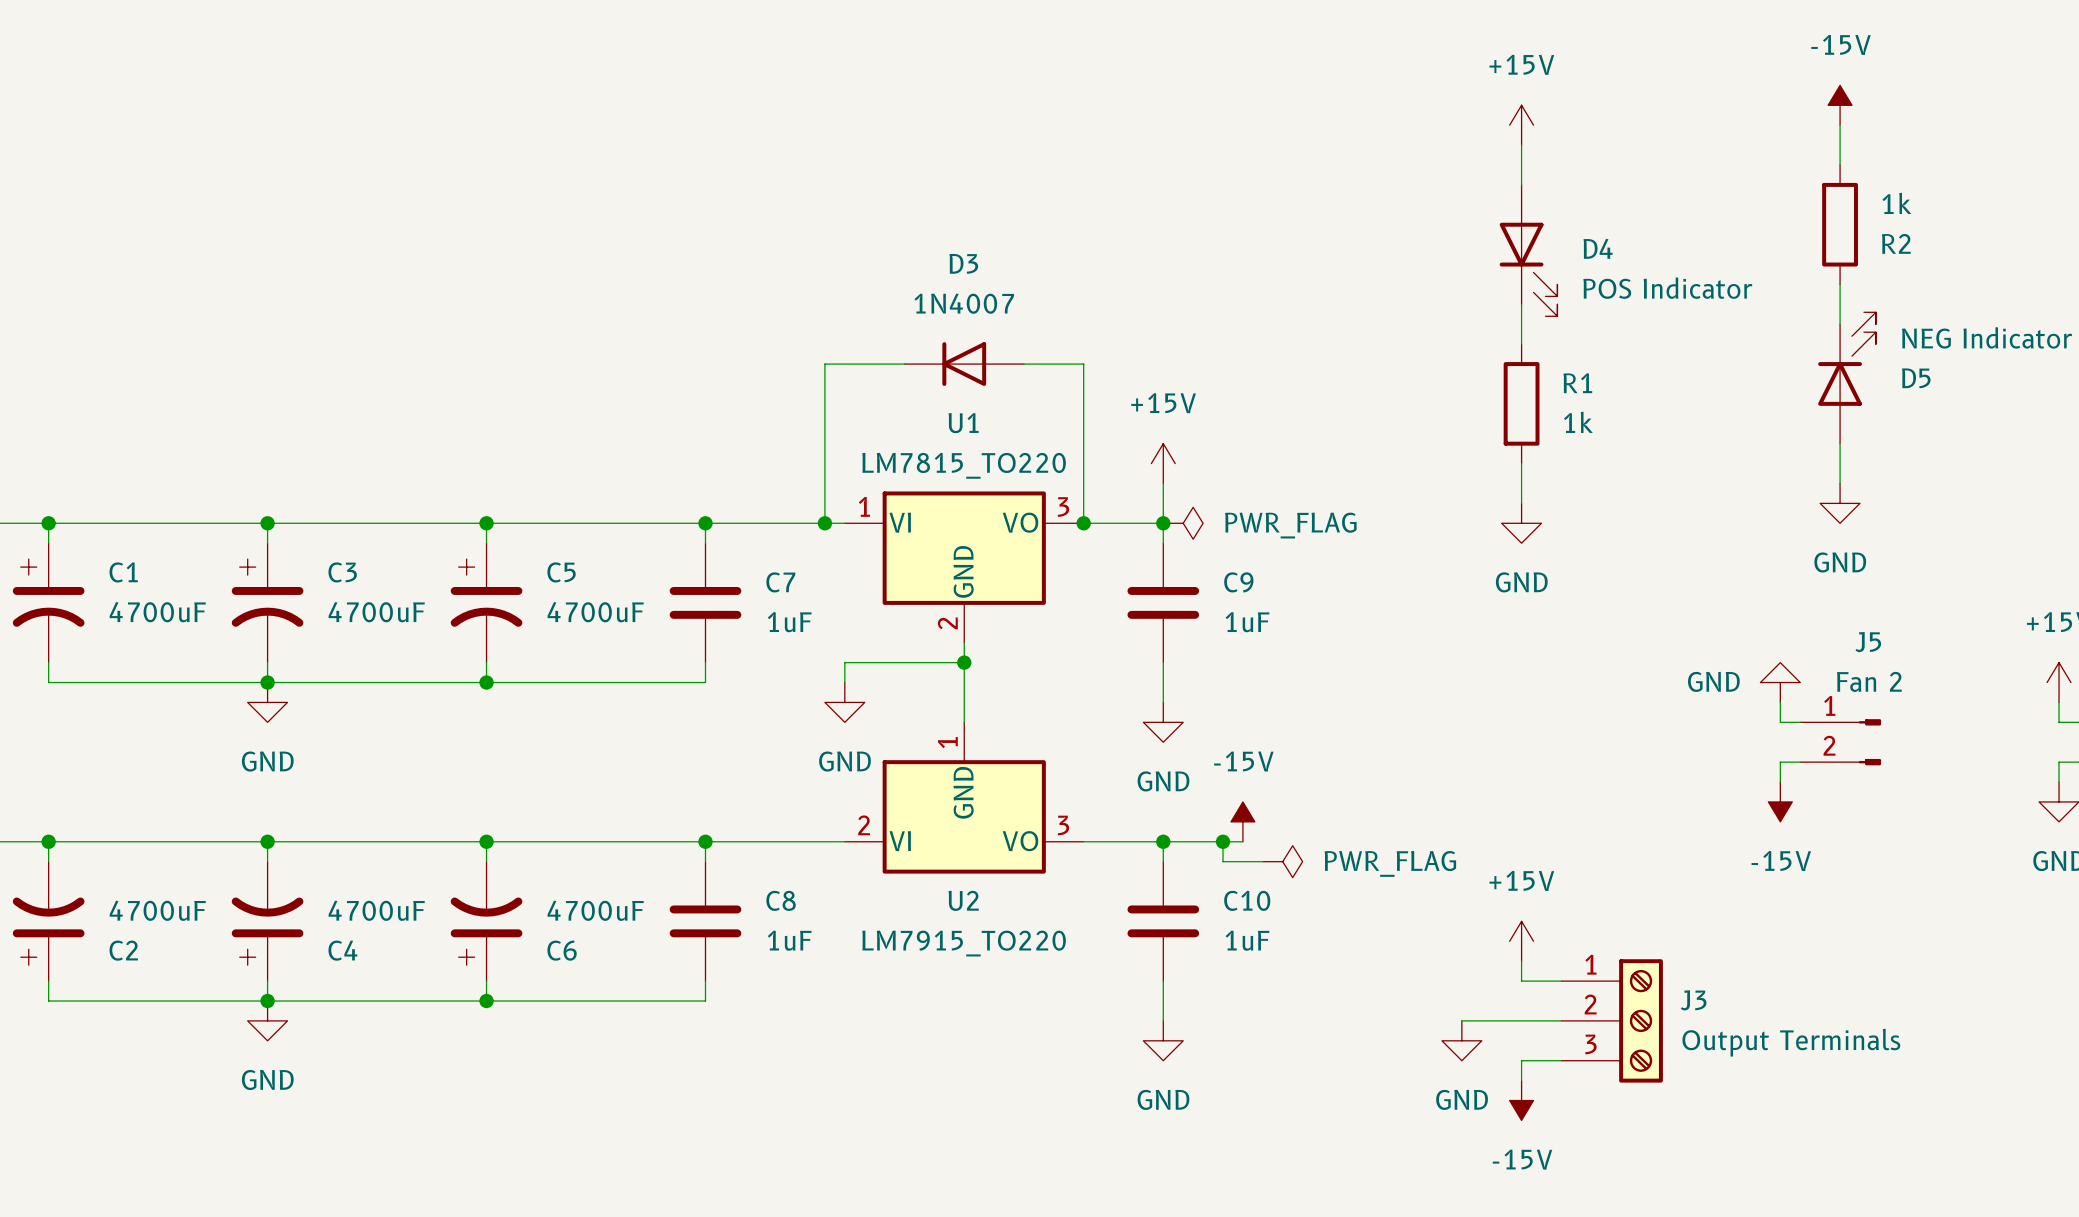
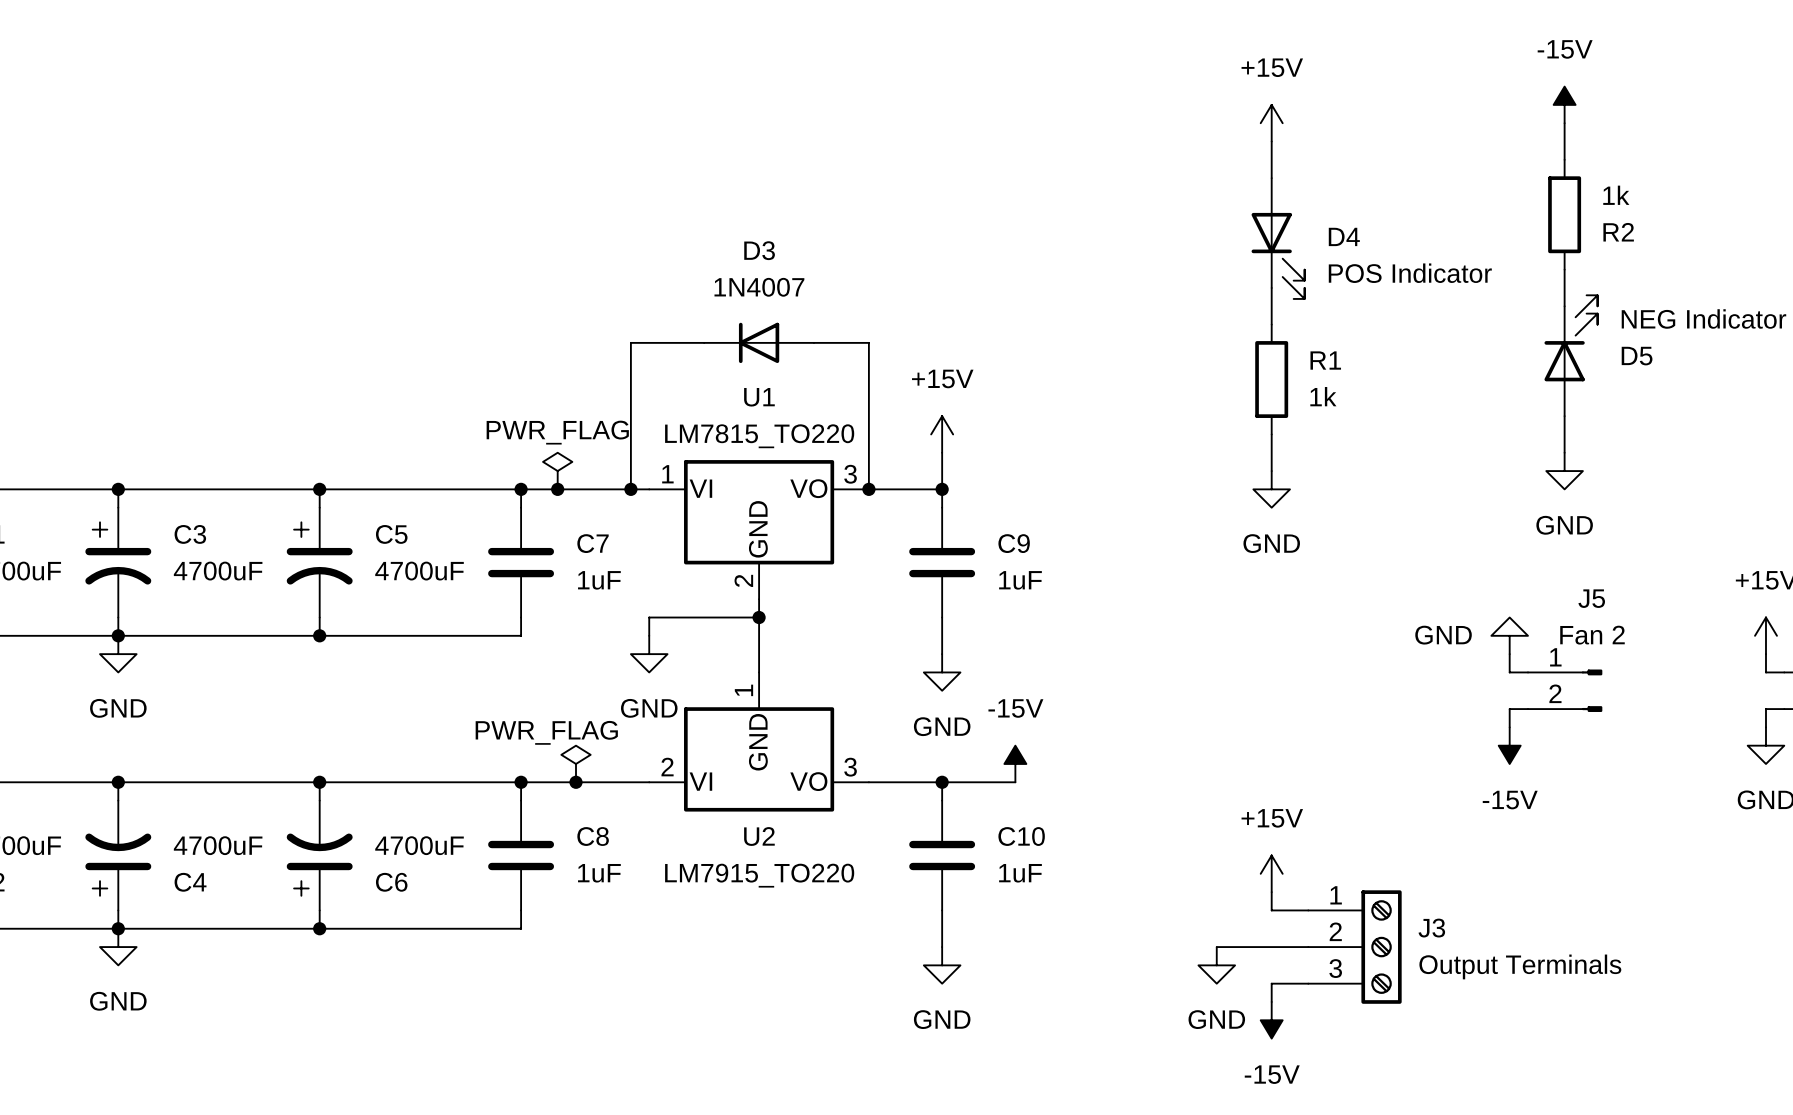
power symbol: none -> PWR_FLAG (557, 471)
junction: none -> (557, 489)
power symbol: PWR_FLAG (1183, 523) -> none
power symbol: none -> PWR_FLAG (576, 763)
junction: none -> (576, 782)
wire: (1223, 841) (1223, 861) (1262, 861) -> none
junction: (1223, 841) -> none
power symbol: PWR_FLAG (1282, 861) -> none

